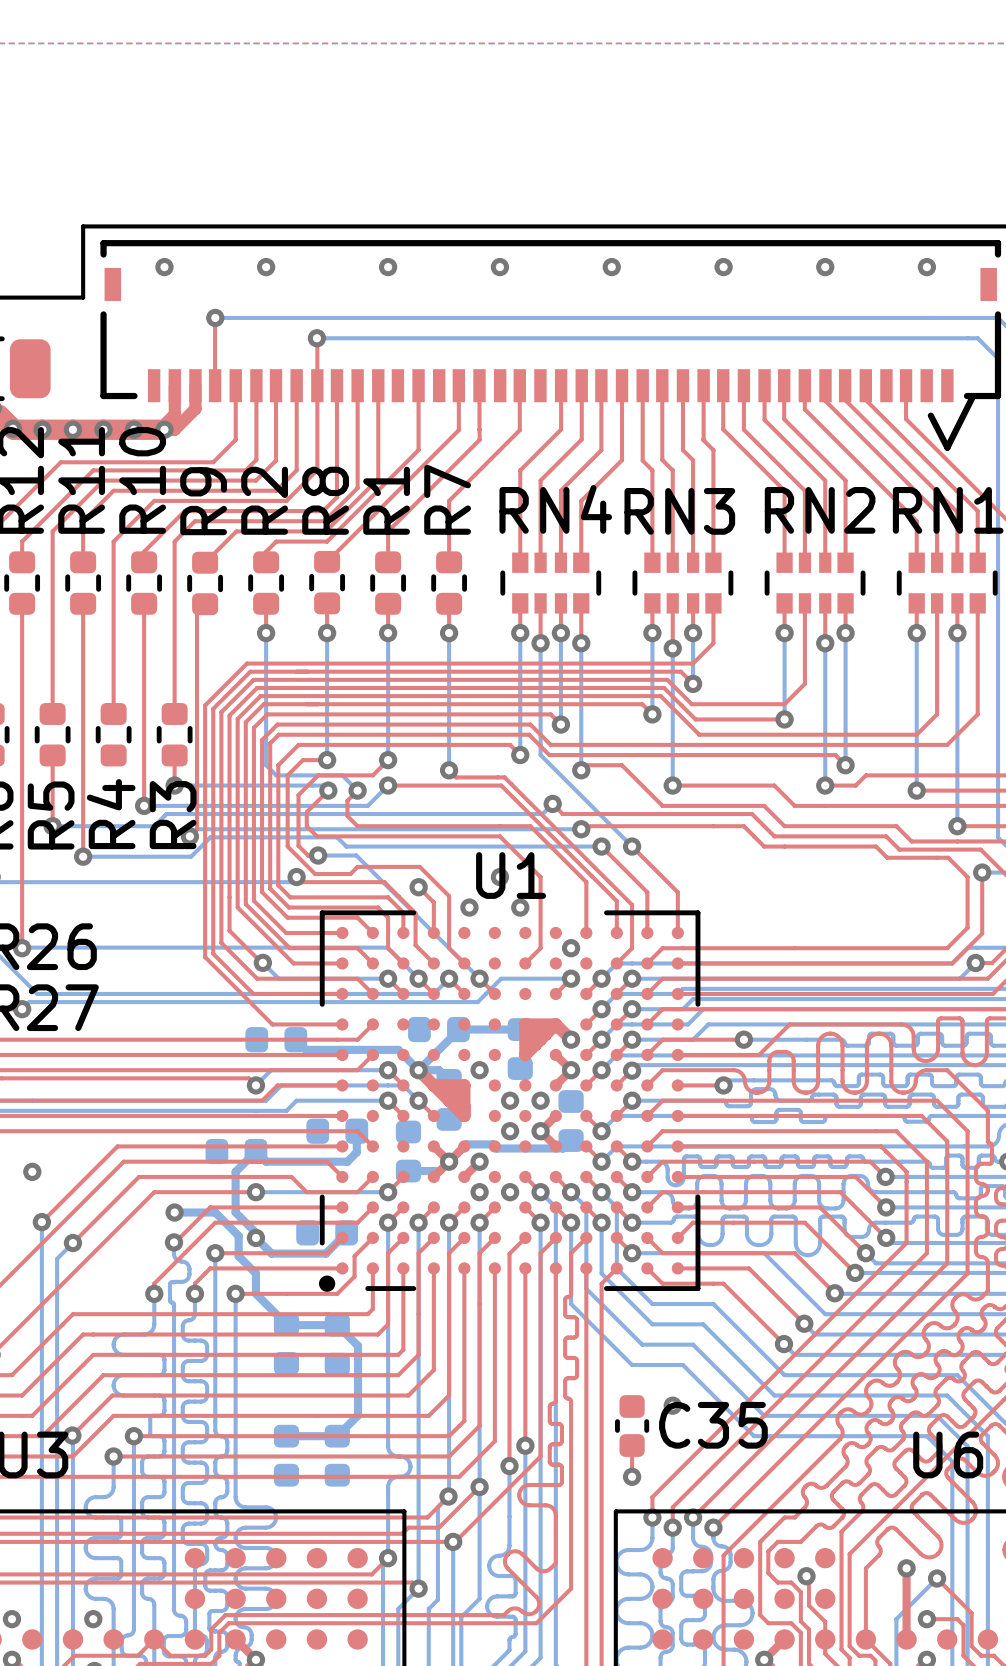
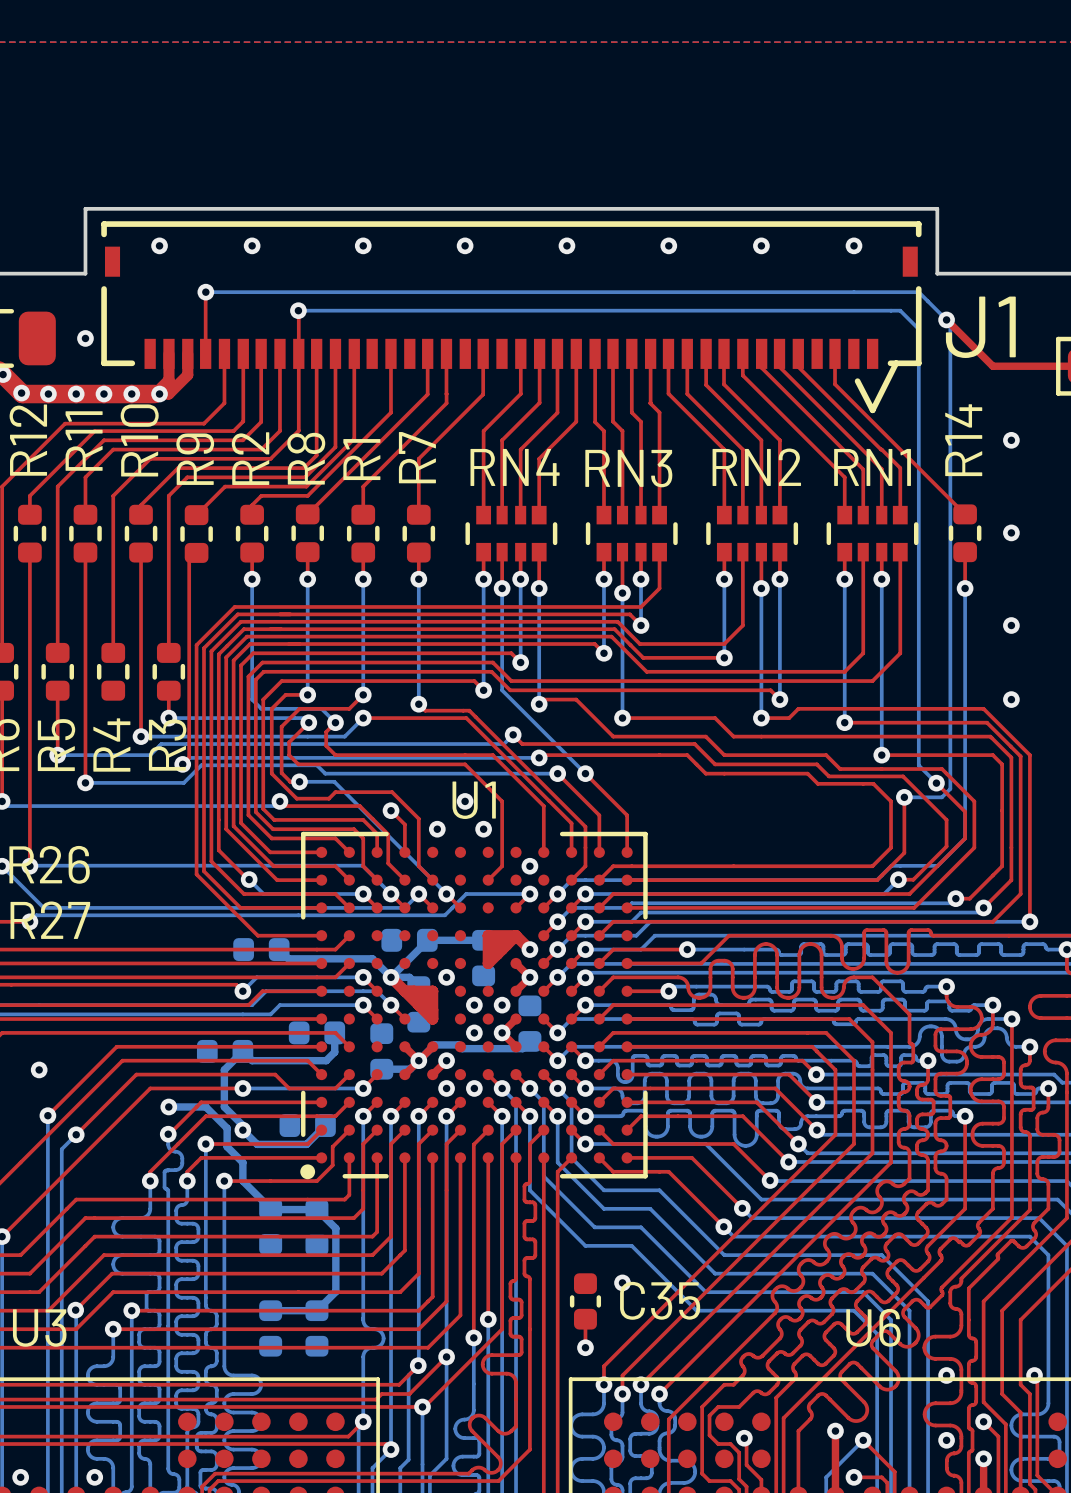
via: none -> (85, 338)

